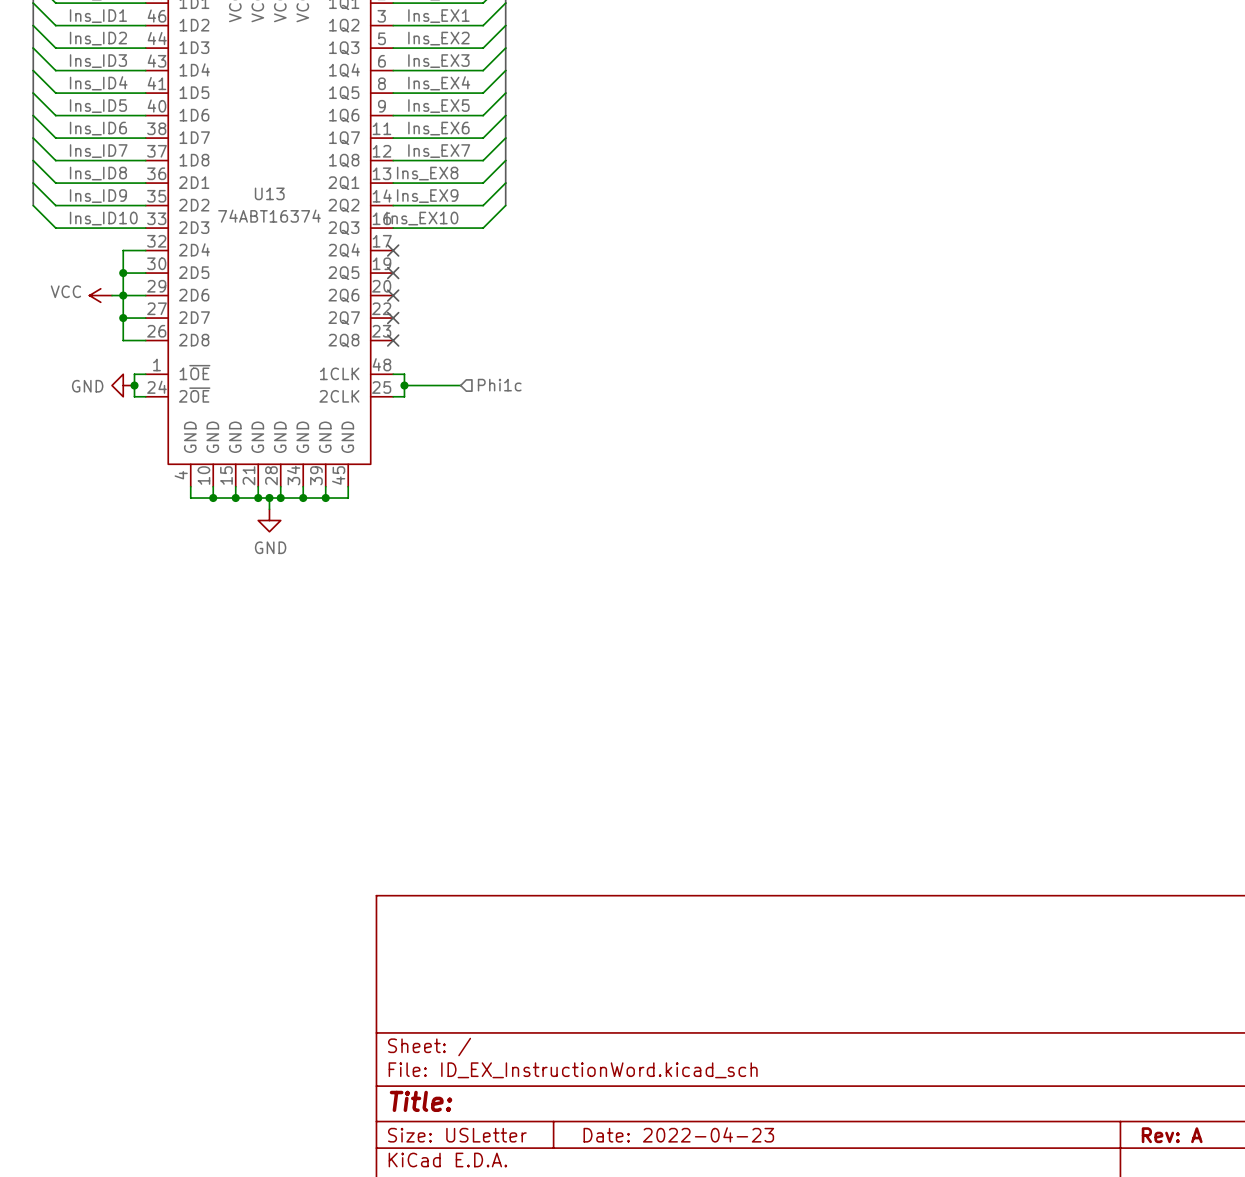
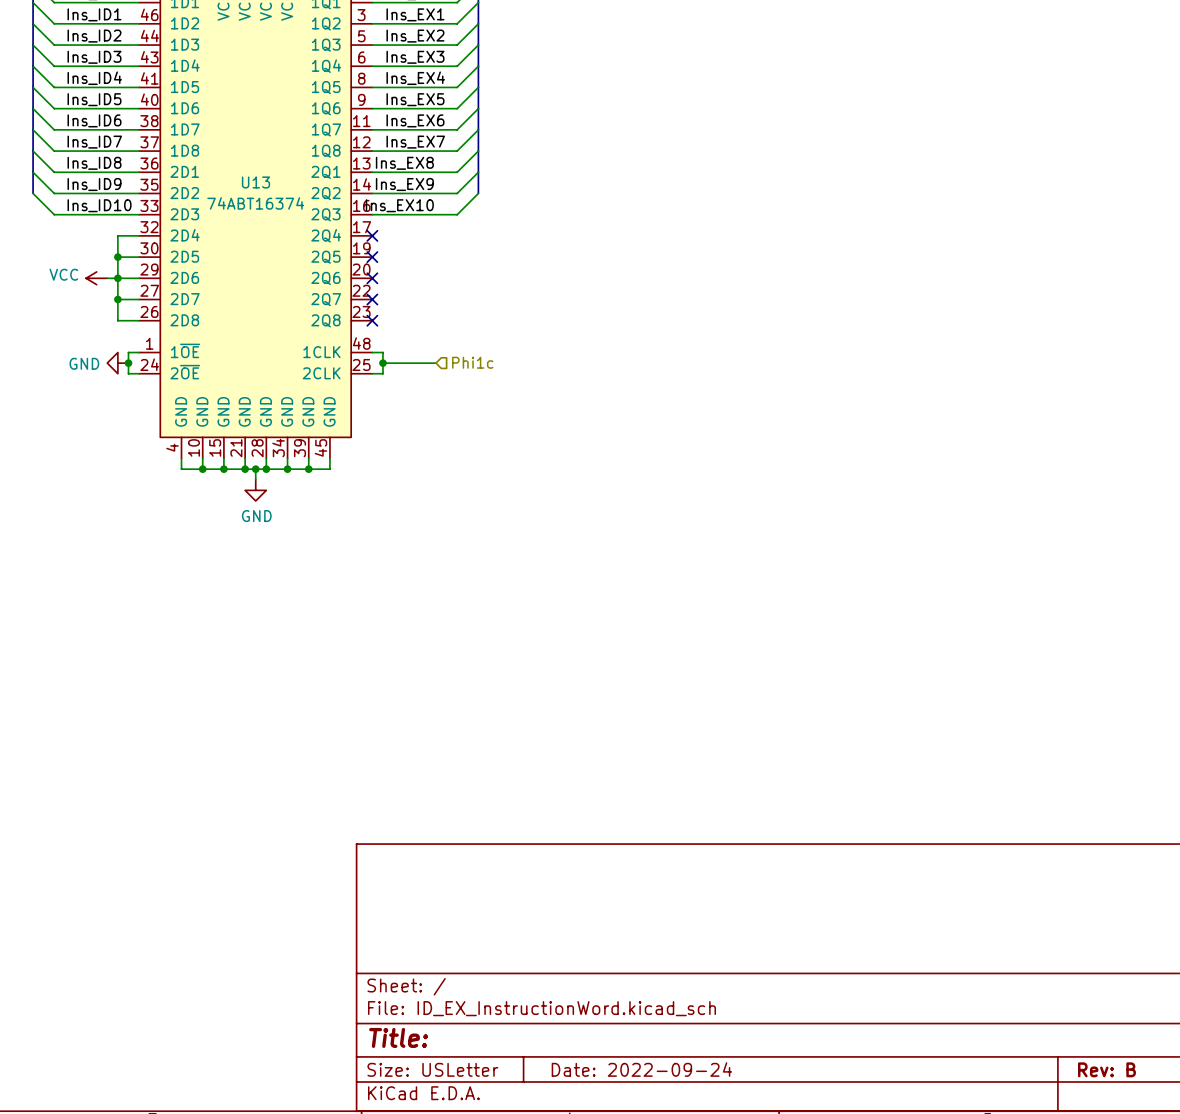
title block: Date: 2022-04-23 (678, 1134) -> Date: 2022-09-24 (641, 1069)
title block: Rev: A (1172, 1135) -> Rev: B (1106, 1069)

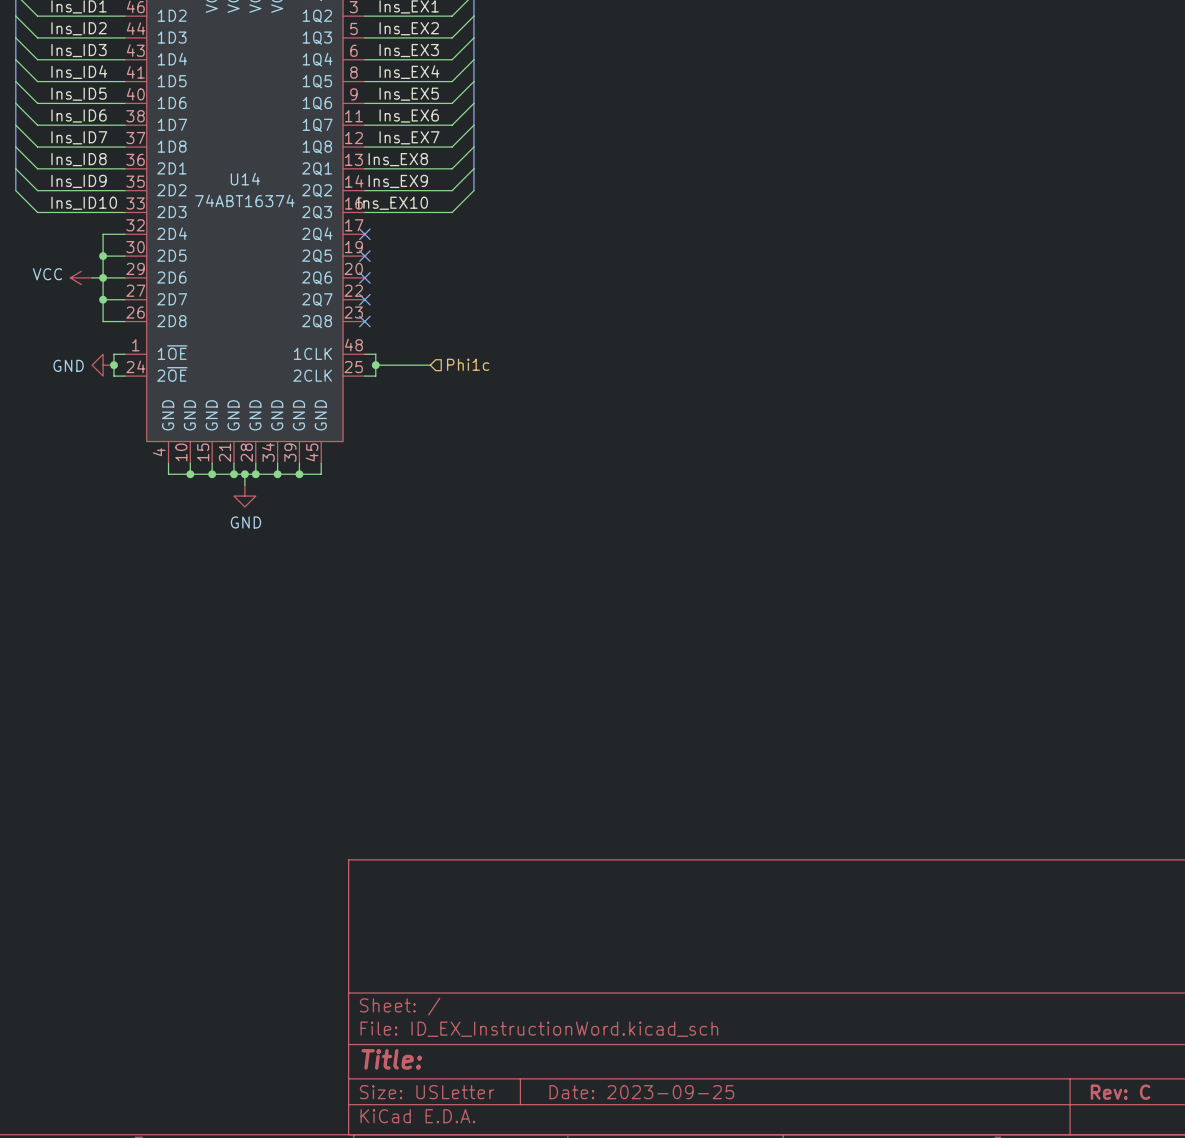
U13 name: U13 (255, 182) -> U14 (245, 179)
title block: Date: 2022-09-24 (641, 1069) -> Date: 2023-09-25 (641, 1092)
title block: Rev: B (1106, 1069) -> Rev: C (1120, 1092)

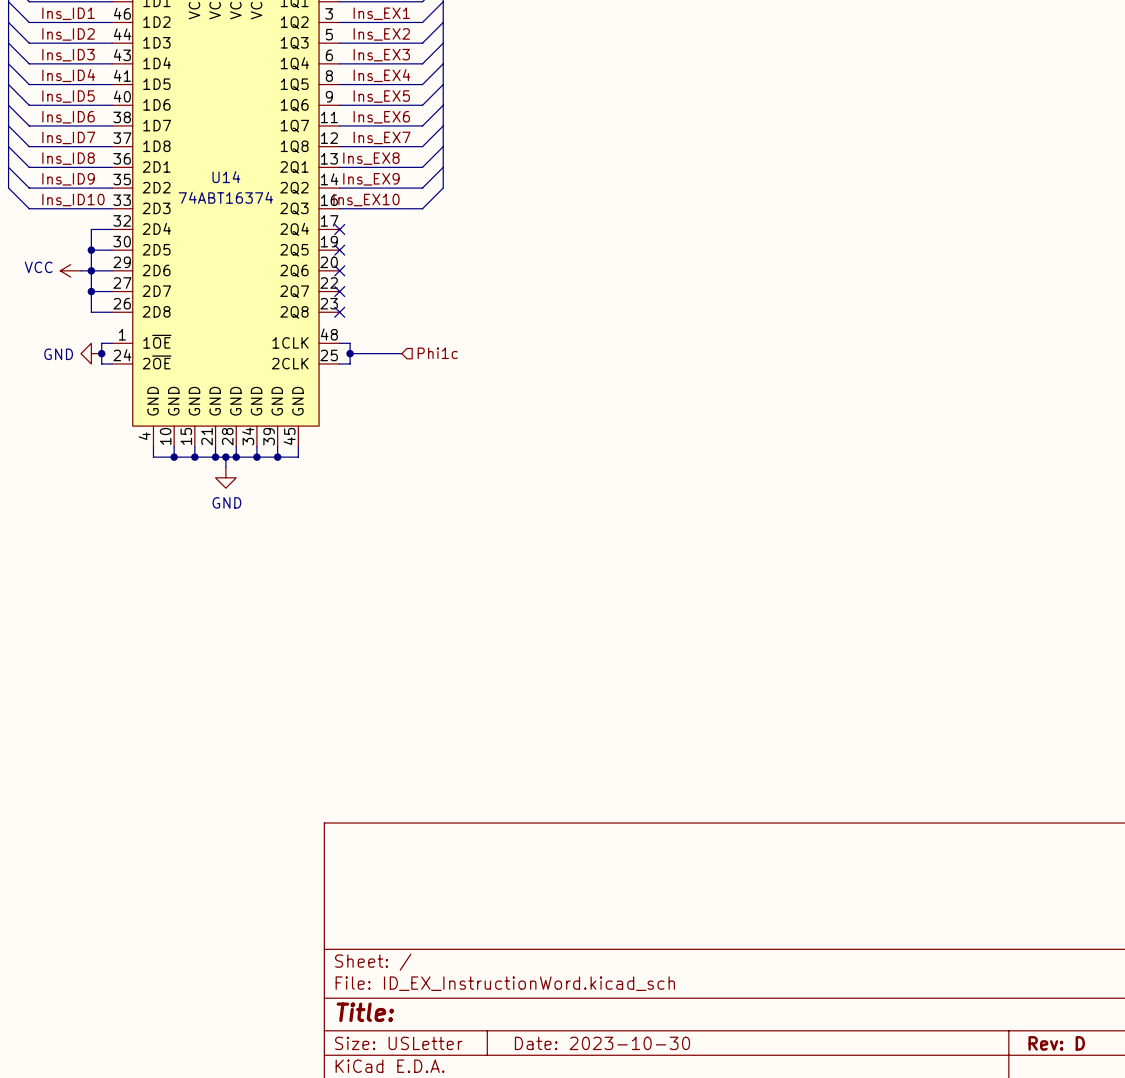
title block: Date: 2023-09-25 (641, 1092) -> Date: 2023-10-30 (602, 1043)
title block: Rev: C (1120, 1092) -> Rev: D (1056, 1043)

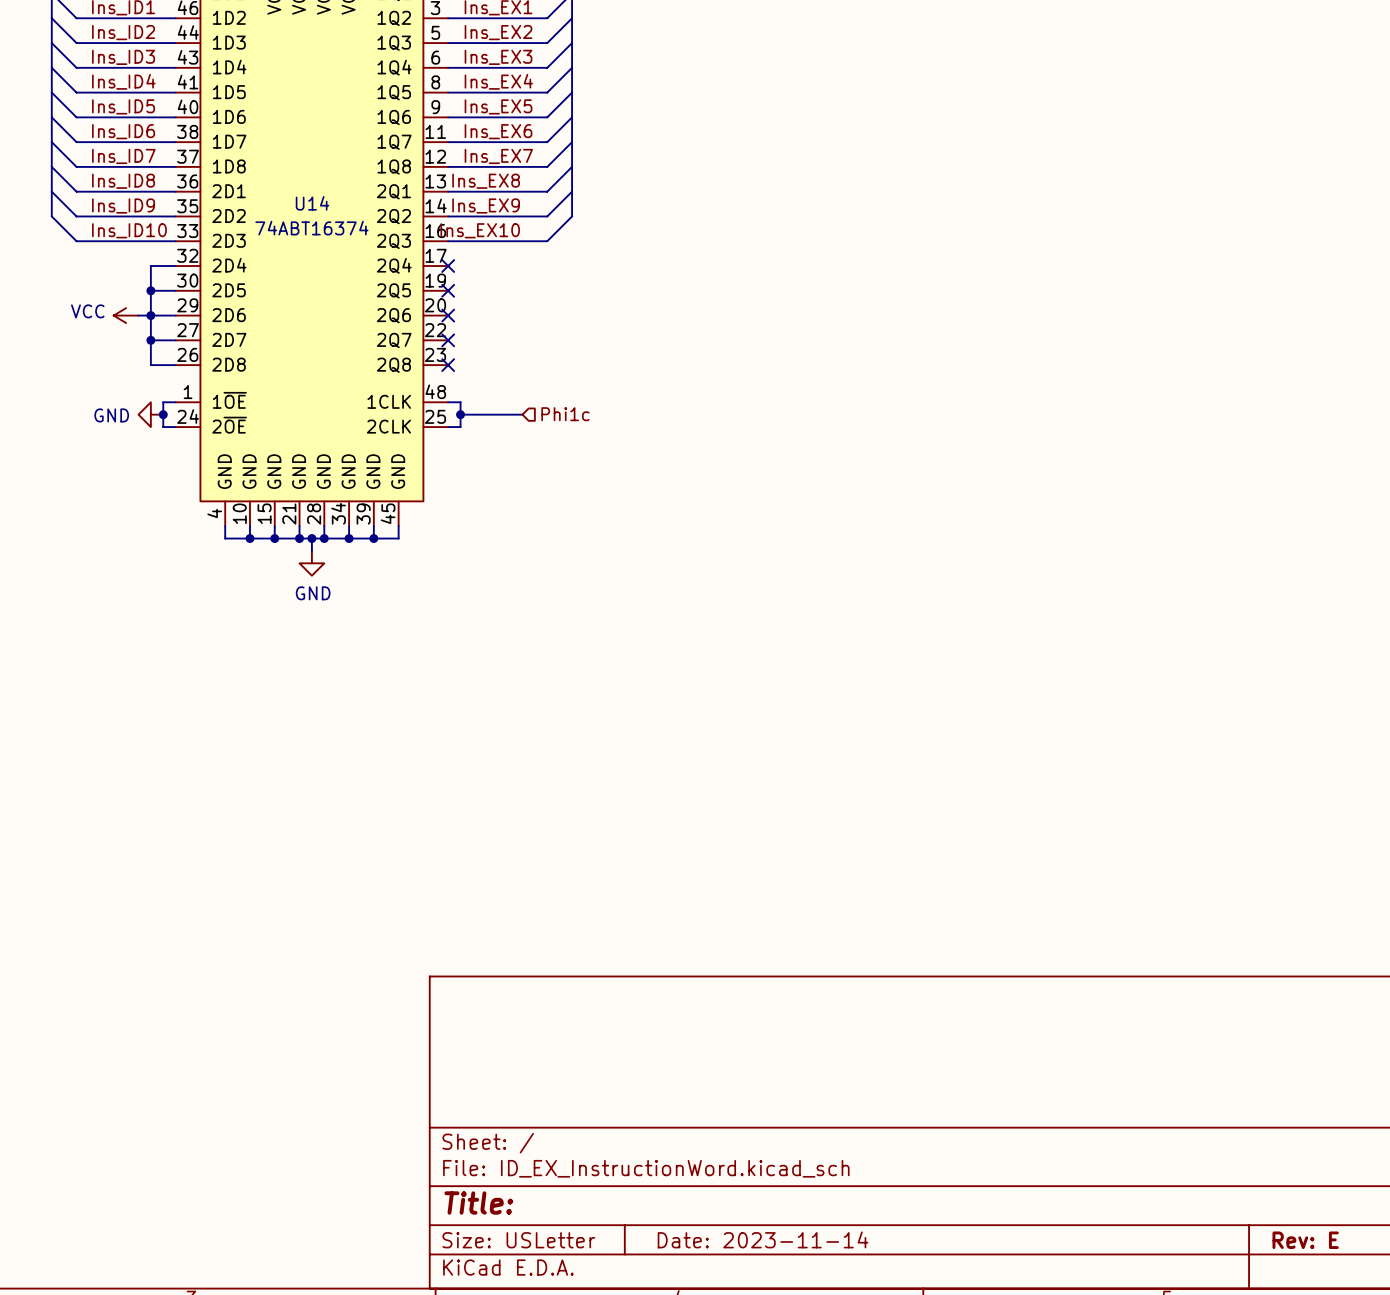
title block: Date: 2023-10-30 (602, 1043) -> Date: 2023-11-14 (763, 1239)
title block: Rev: D (1056, 1043) -> Rev: E (1305, 1240)

